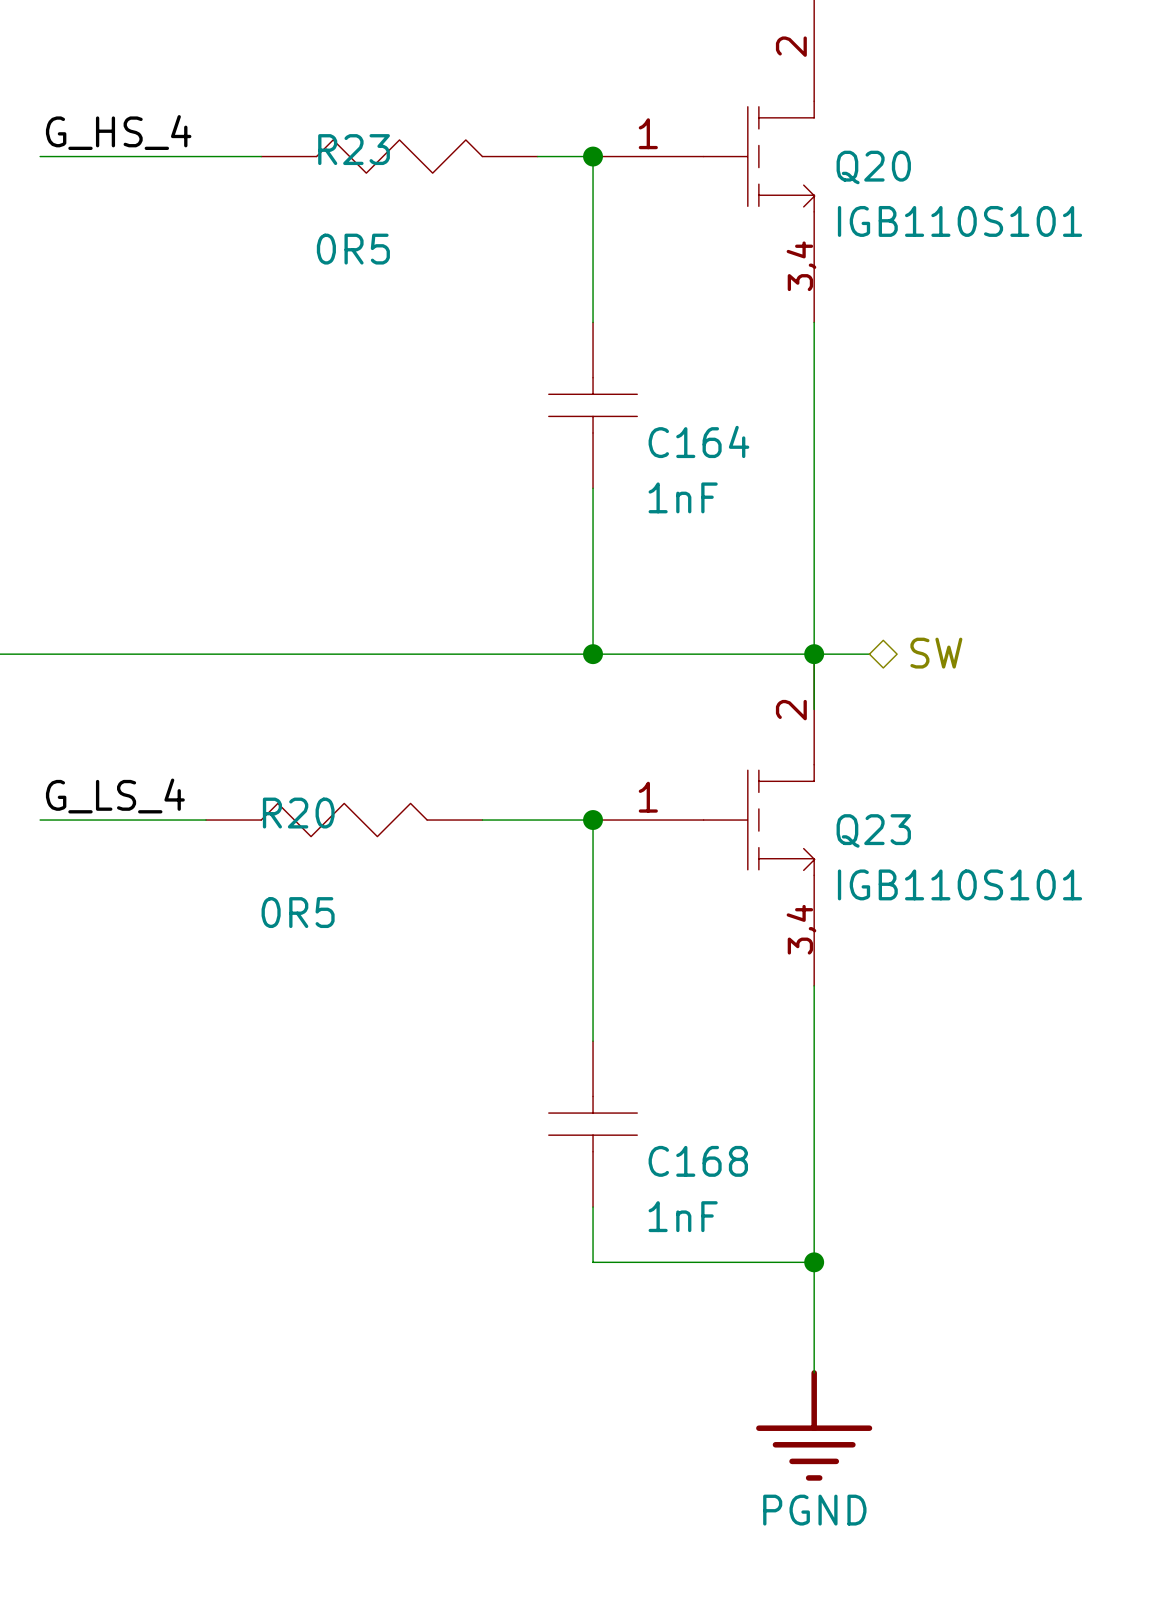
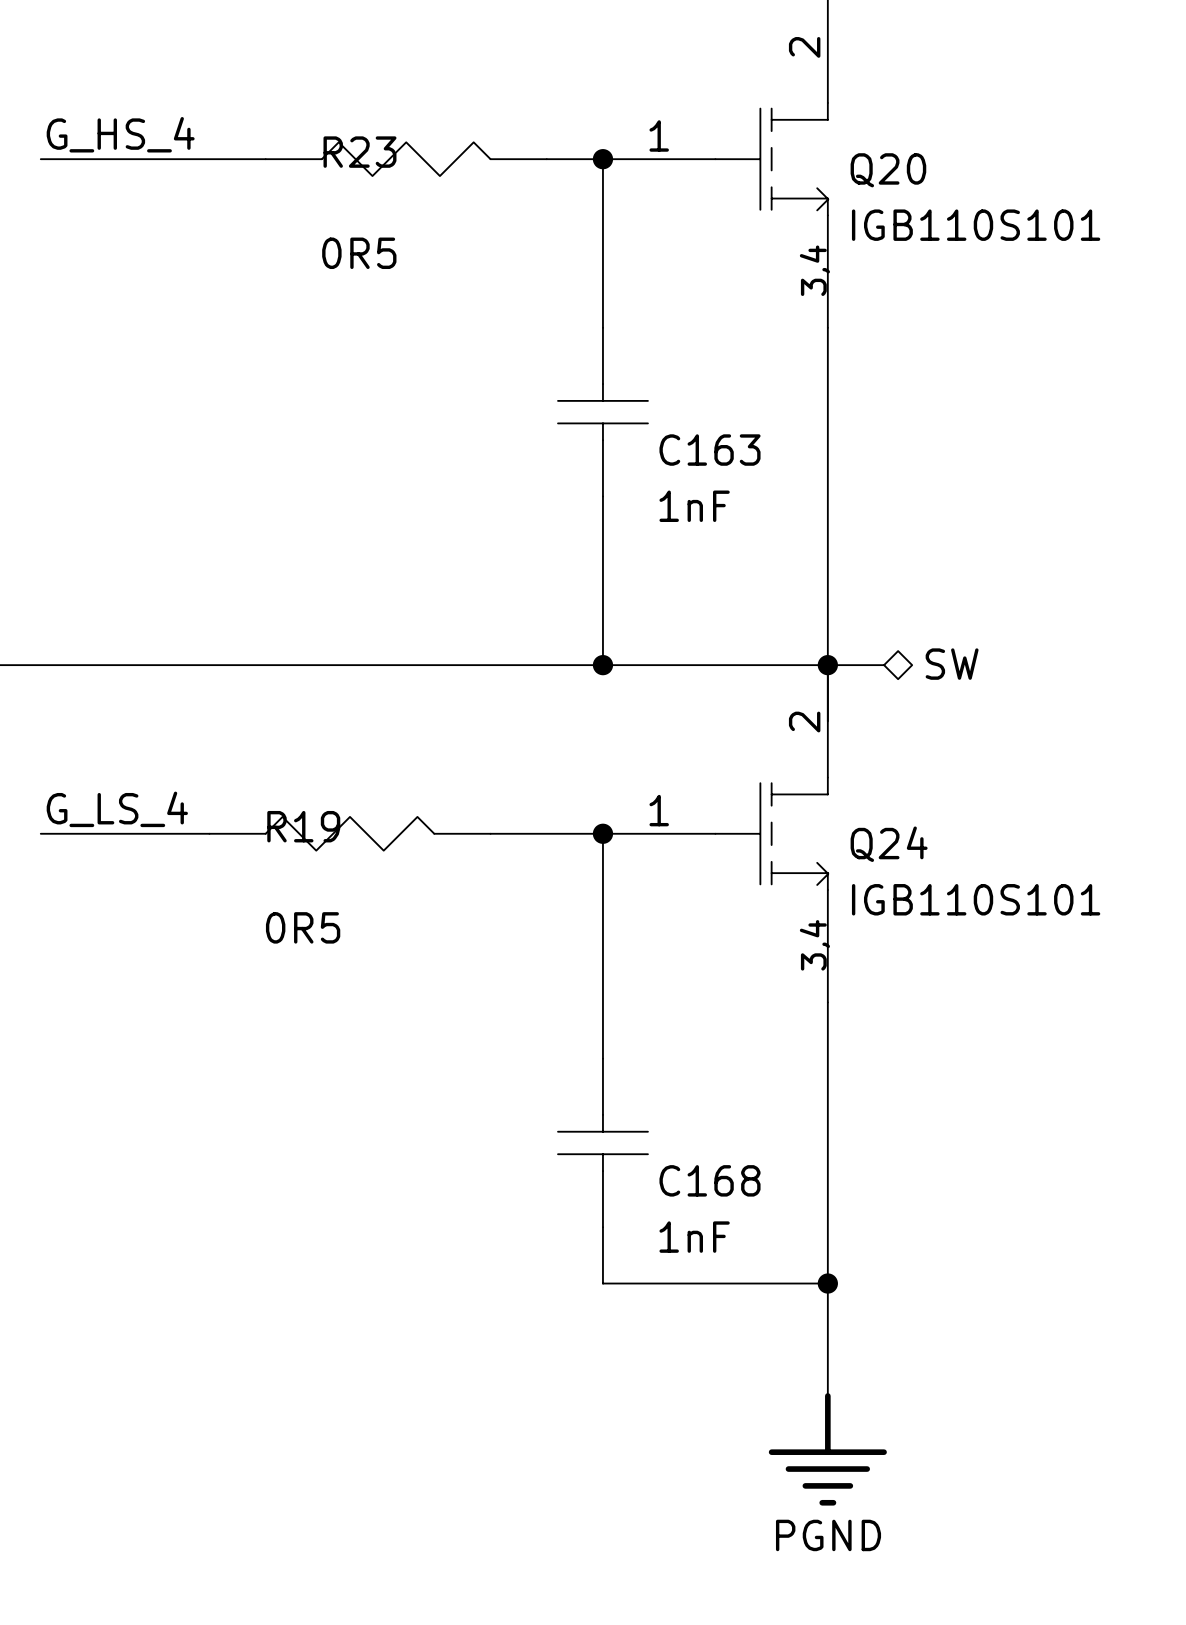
C164 name: C164 (698, 441) -> C163 (710, 450)
R20 name: R20 (298, 813) -> R19 (303, 826)
Q23 name: Q23 (873, 830) -> Q24 (889, 844)

